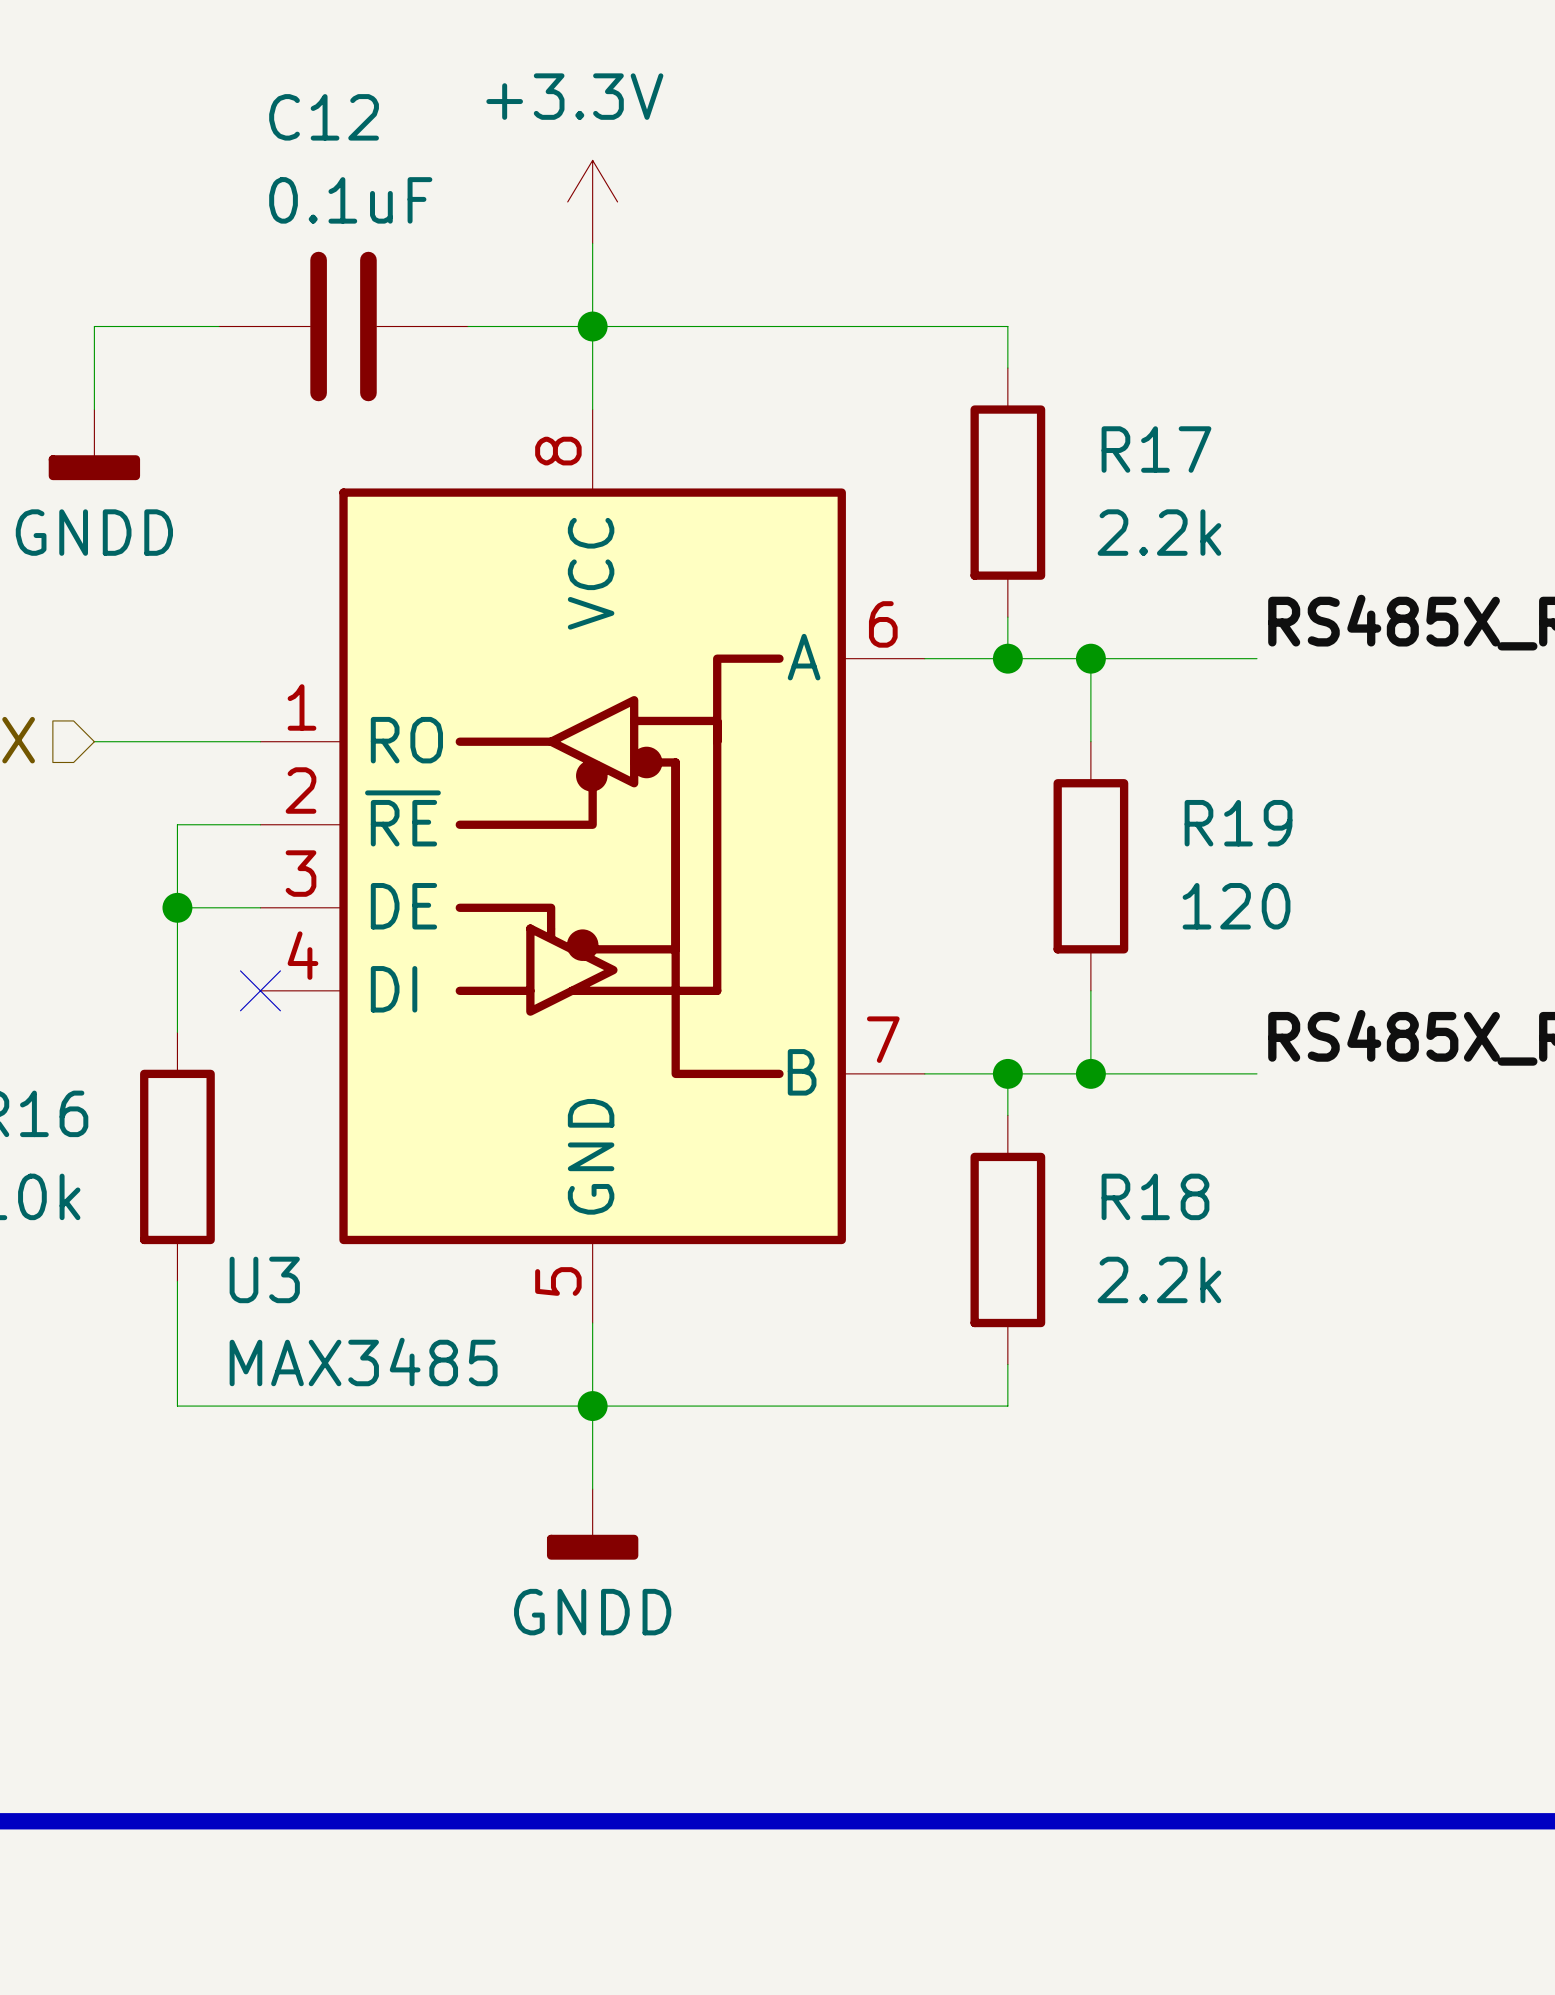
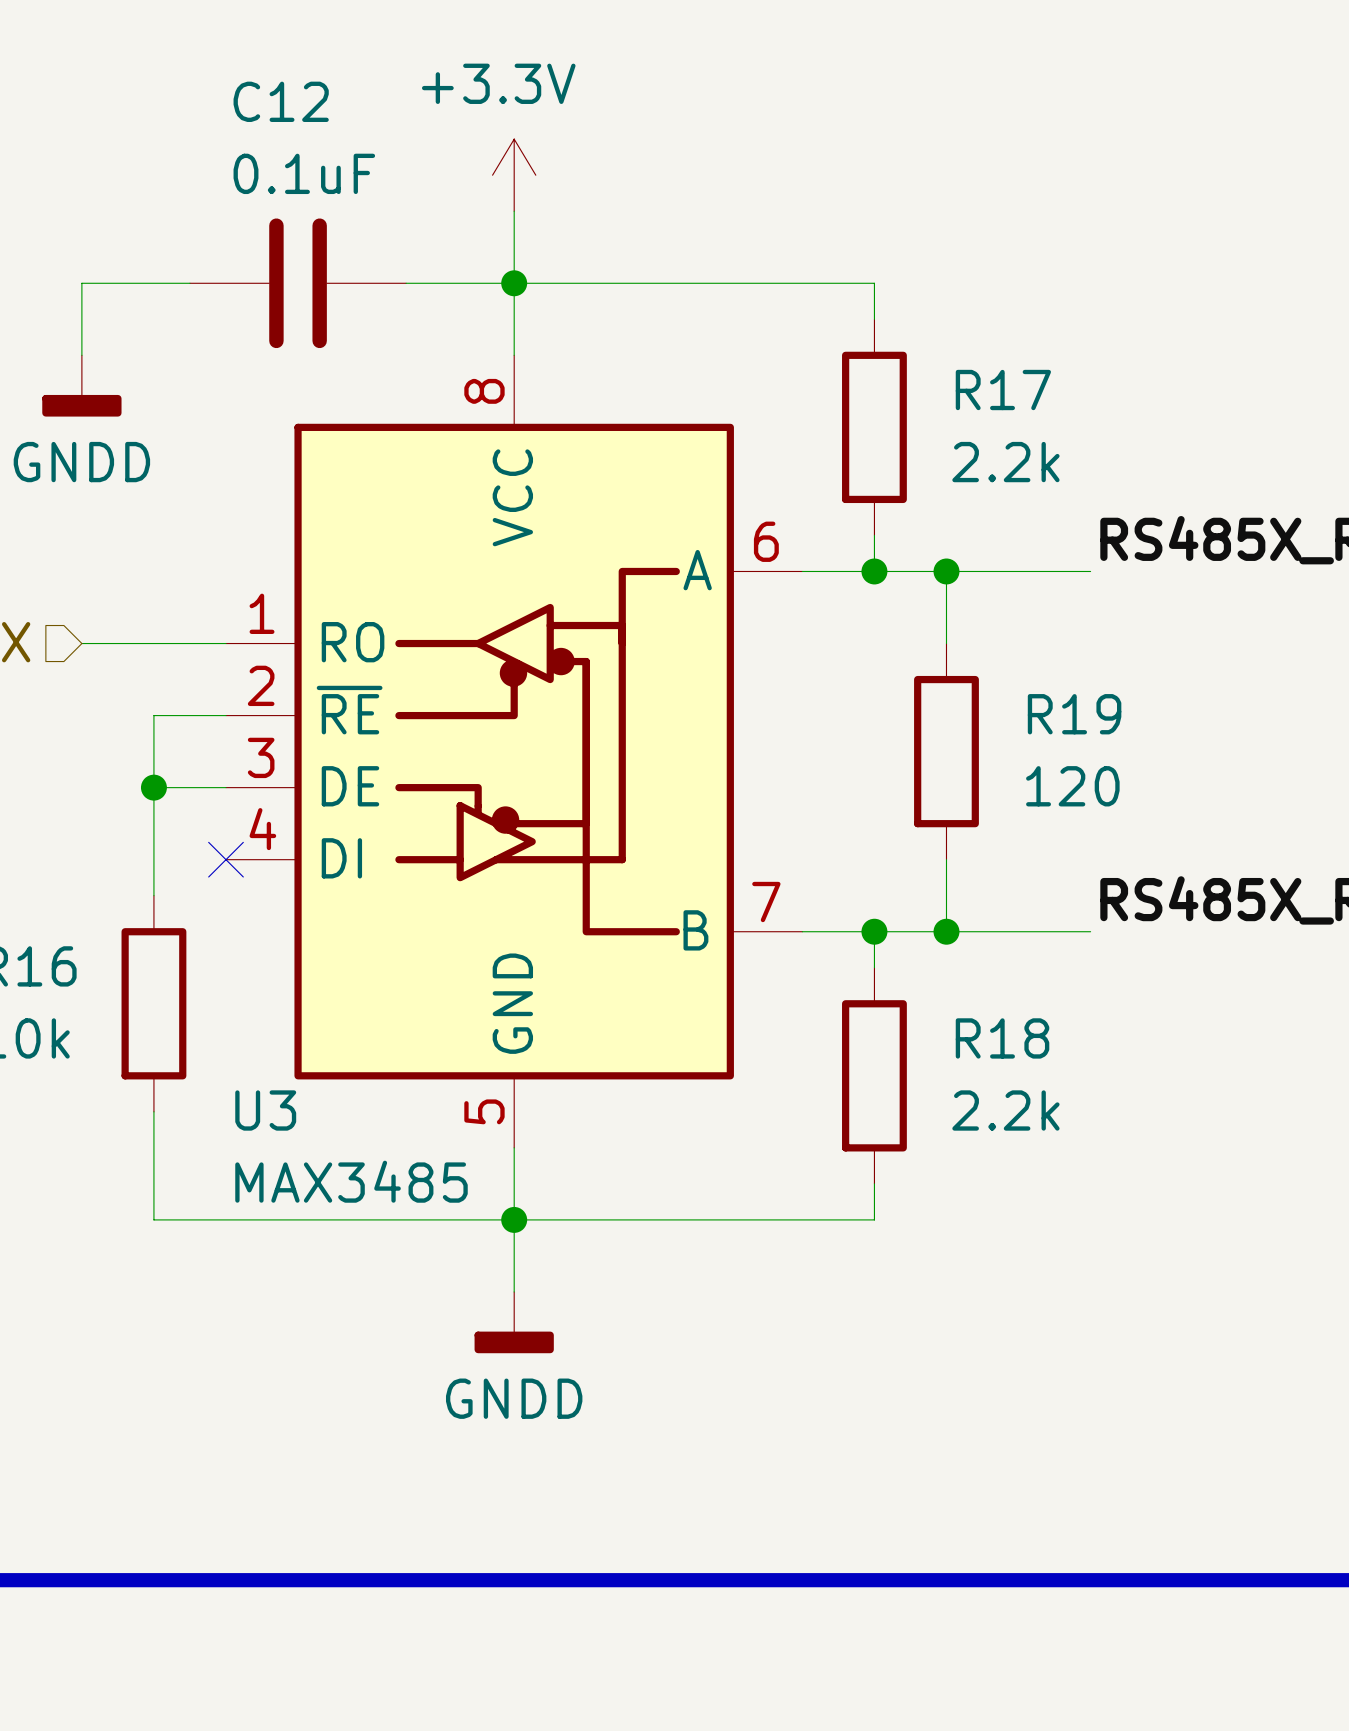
U3 name position: U3 (264, 1279) -> U3 (265, 1110)
U3 value position: MAX3485 (363, 1361) -> MAX3485 (351, 1181)

